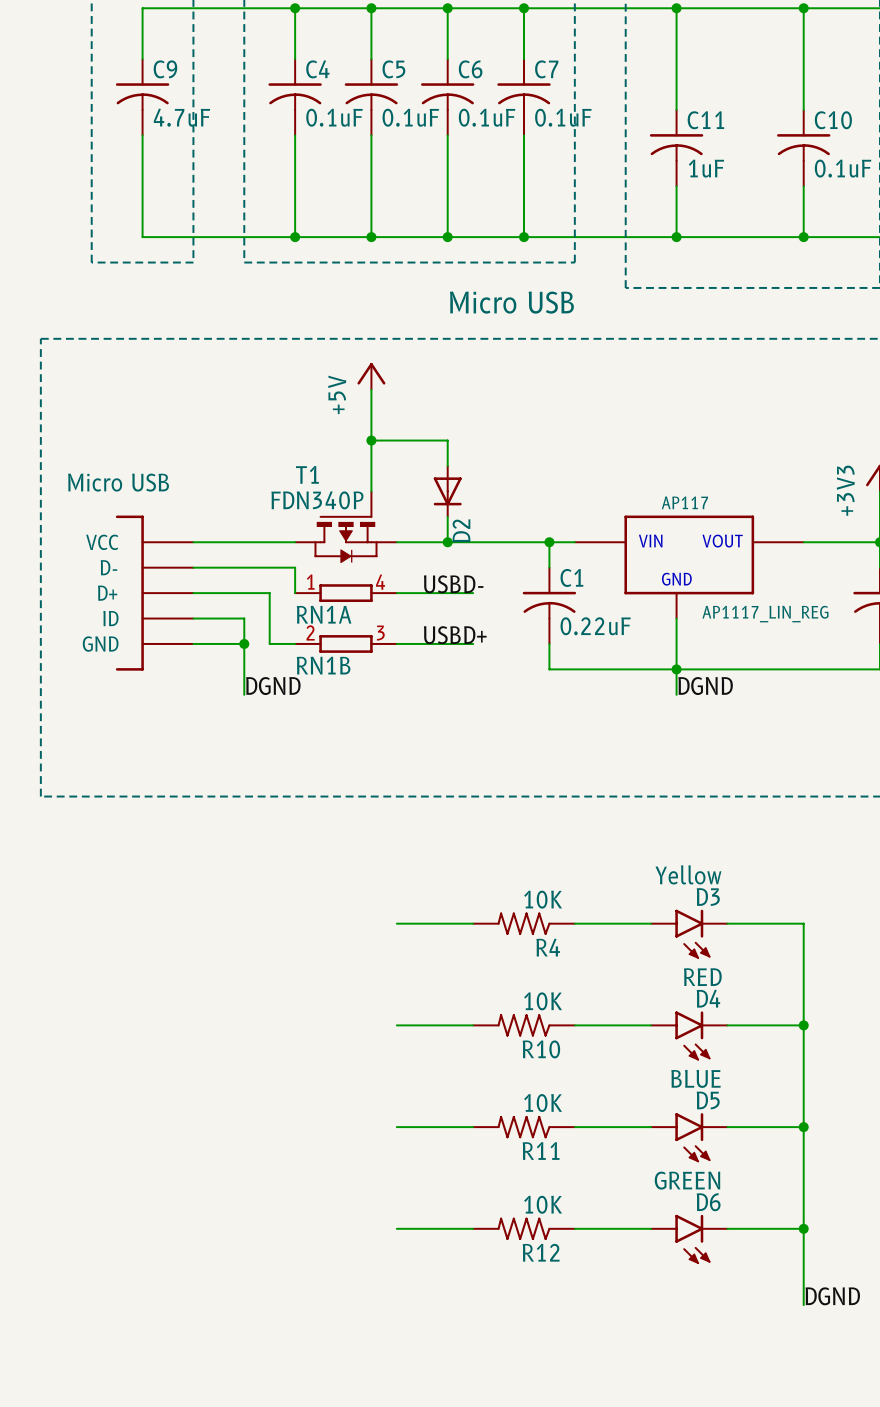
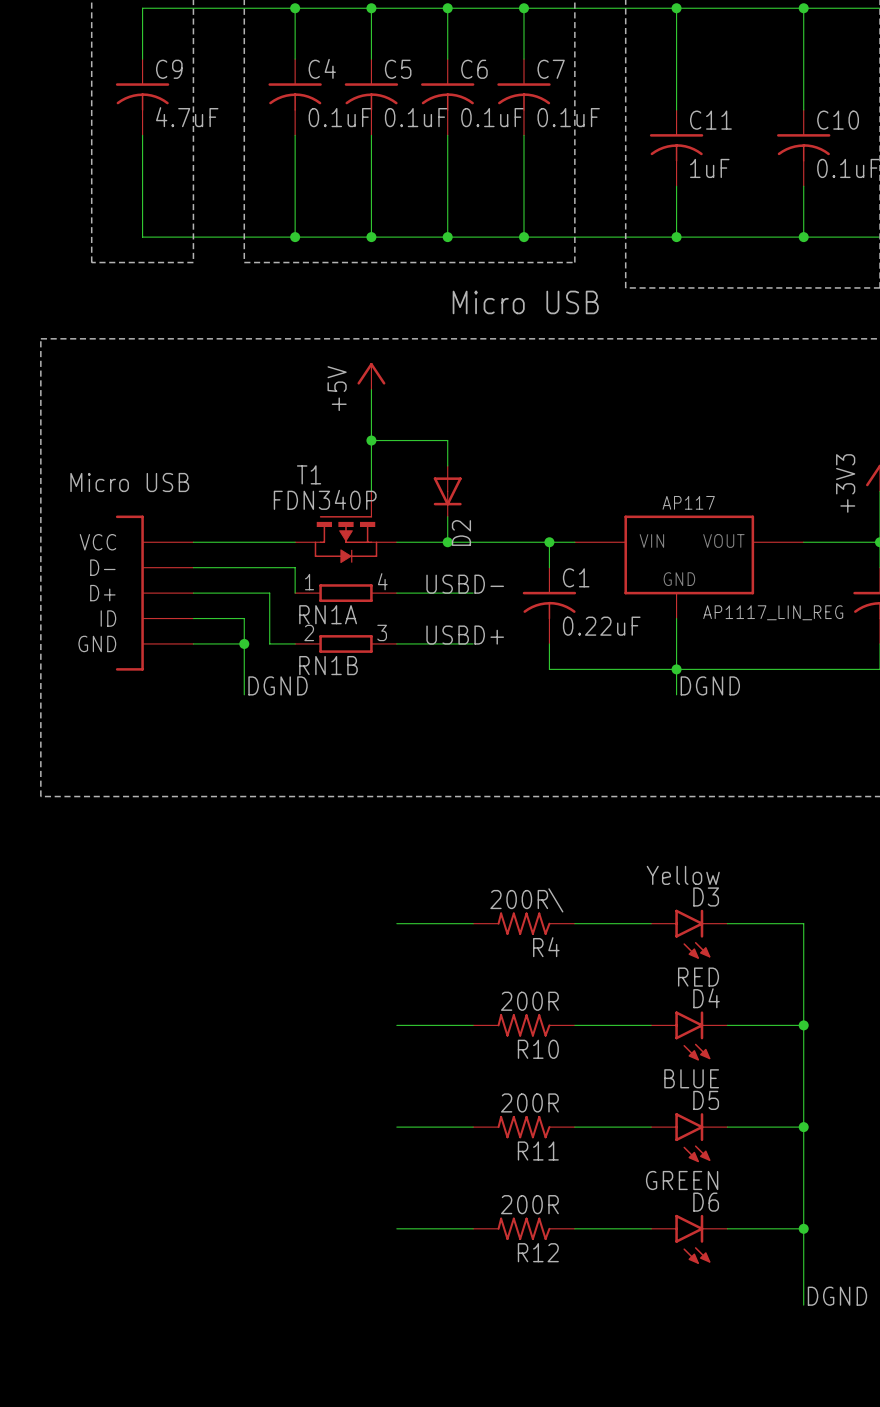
R4 value: 10K (543, 899) -> 200R\ (526, 900)
R10 value: 10K (543, 1001) -> 200R (529, 1001)
R11 value: 10K (543, 1103) -> 200R (529, 1102)
R12 value: 10K (543, 1204) -> 200R (529, 1204)

